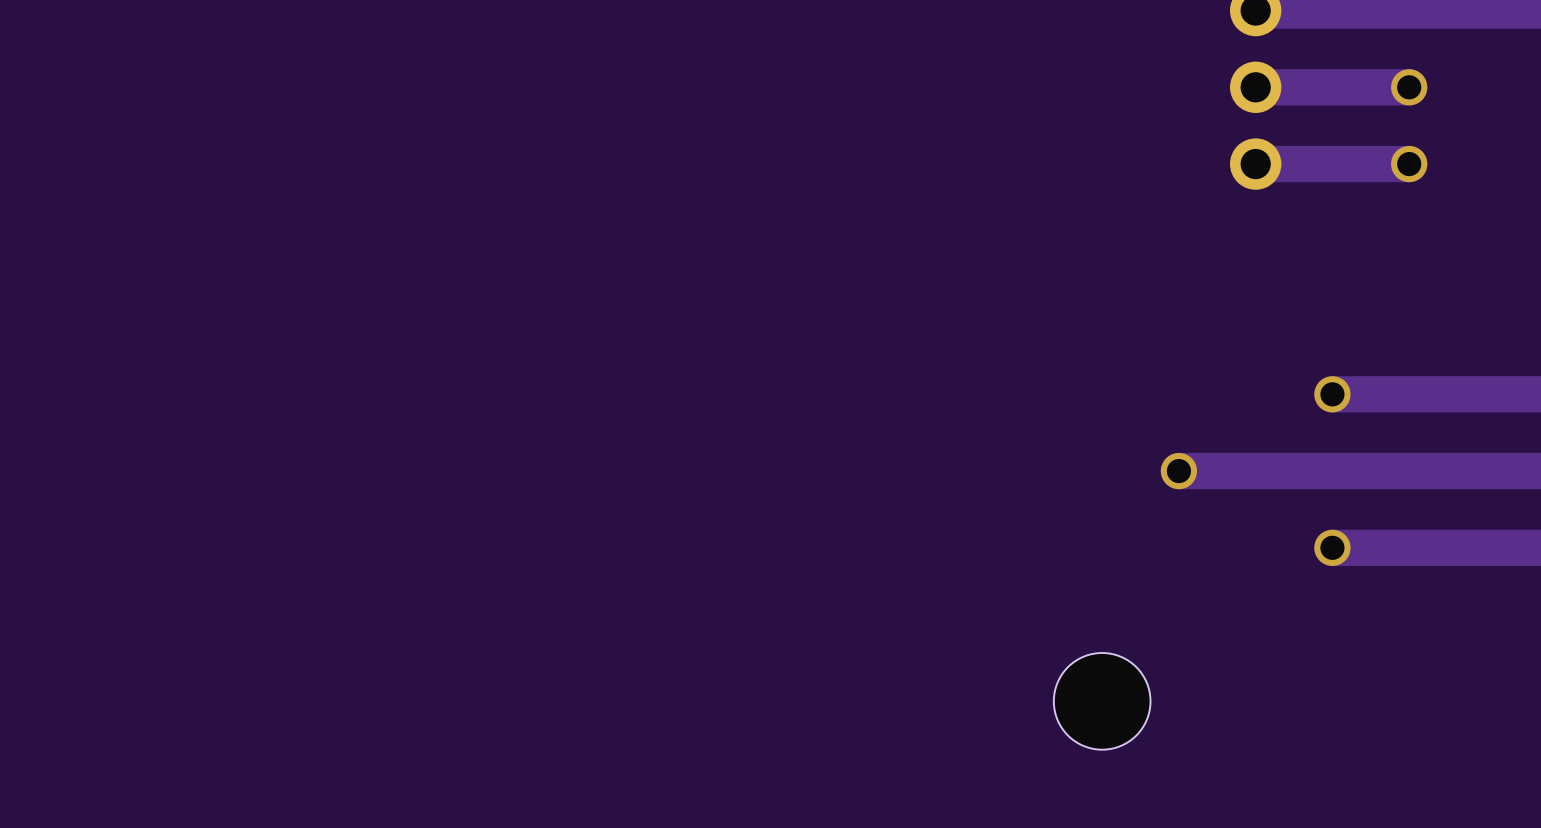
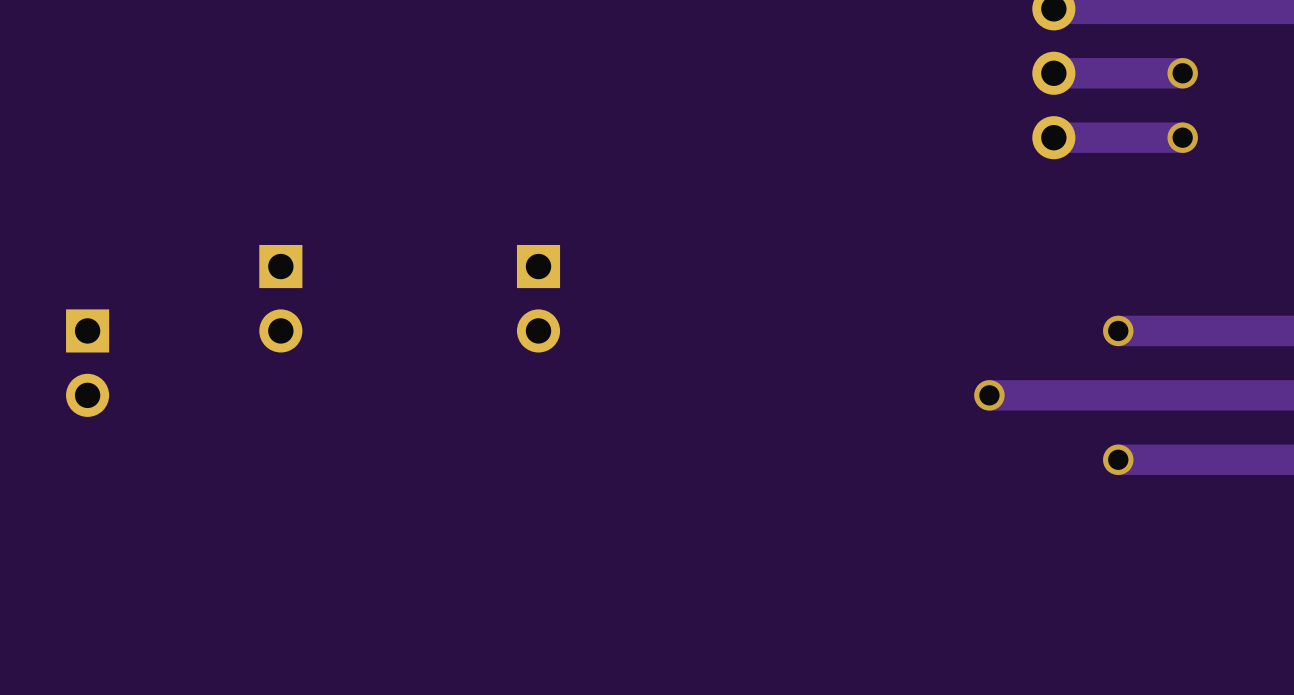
part: none -> (280, 298)
part: none -> (538, 298)
part: none -> (87, 363)
part: (1102, 701) -> none

